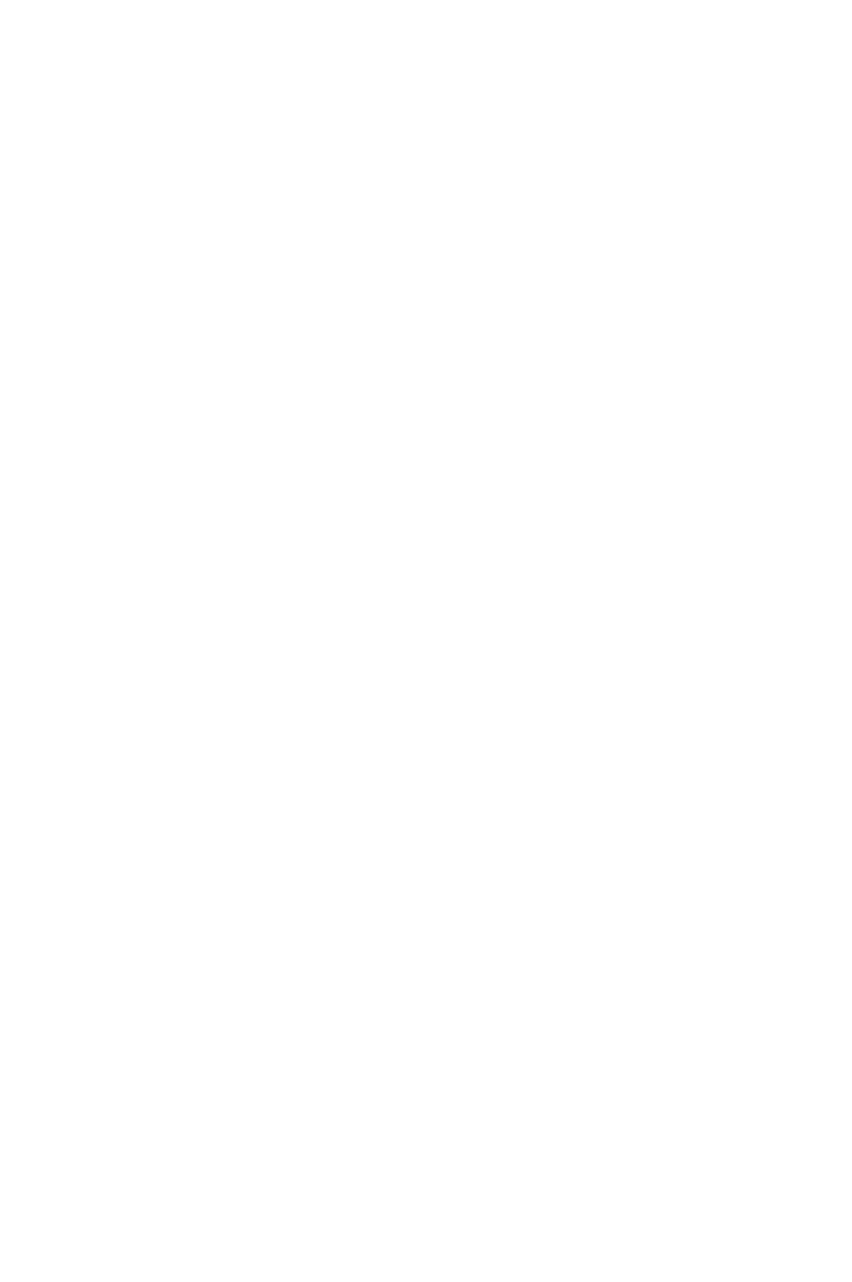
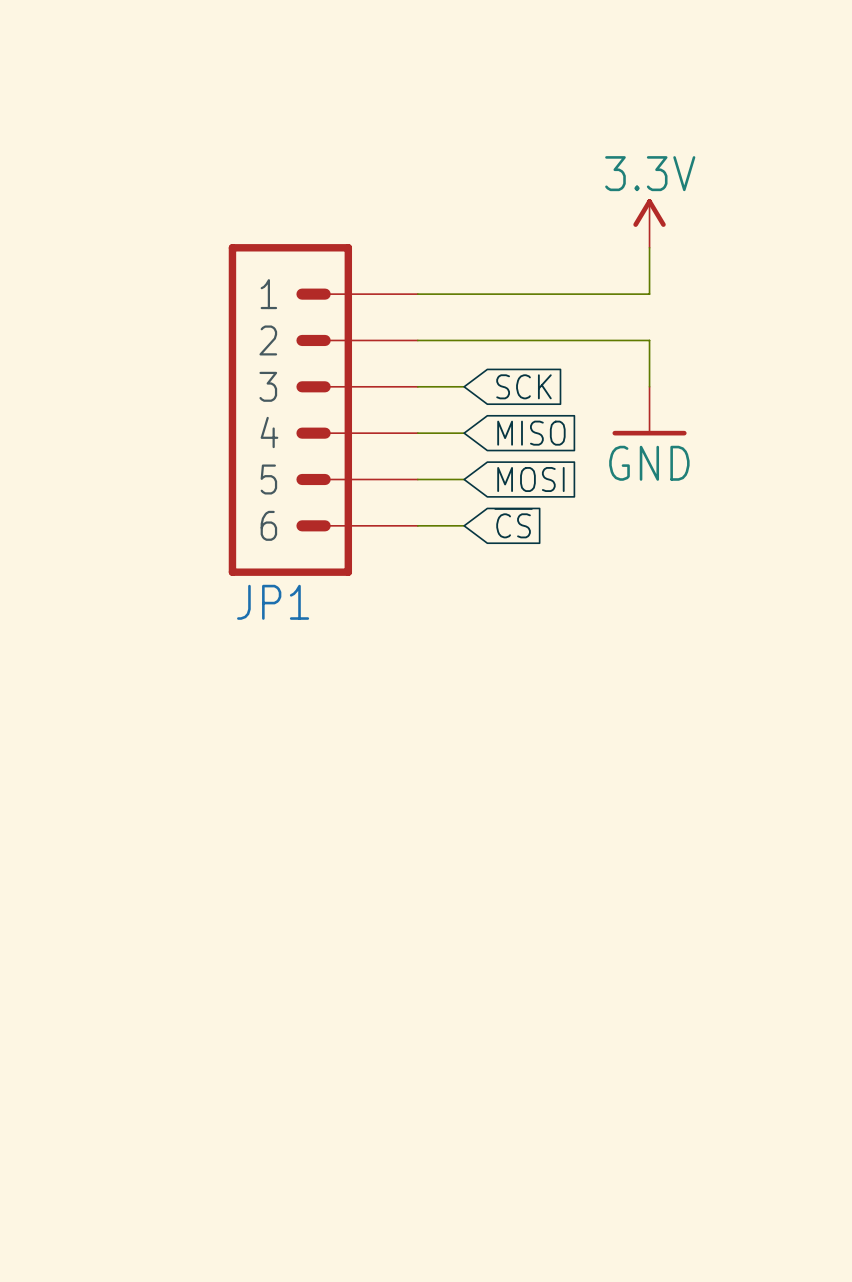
power symbol: none -> 3.3V (649, 223)
wire: none -> (649, 247) (649, 294) (417, 294)
wire: none -> (417, 340) (649, 340) (649, 386)
wire: none -> (417, 386) (464, 386)
global label: none -> SCK (523, 386)
JP1: none -> (323, 409)
power symbol: none -> GND (649, 411)
wire: none -> (417, 433) (464, 433)
global label: none -> MISO (531, 433)
wire: none -> (417, 479) (464, 479)
global label: none -> MOSI (530, 479)
global label: none -> ~{CS} (513, 523)
wire: none -> (417, 525) (464, 525)

